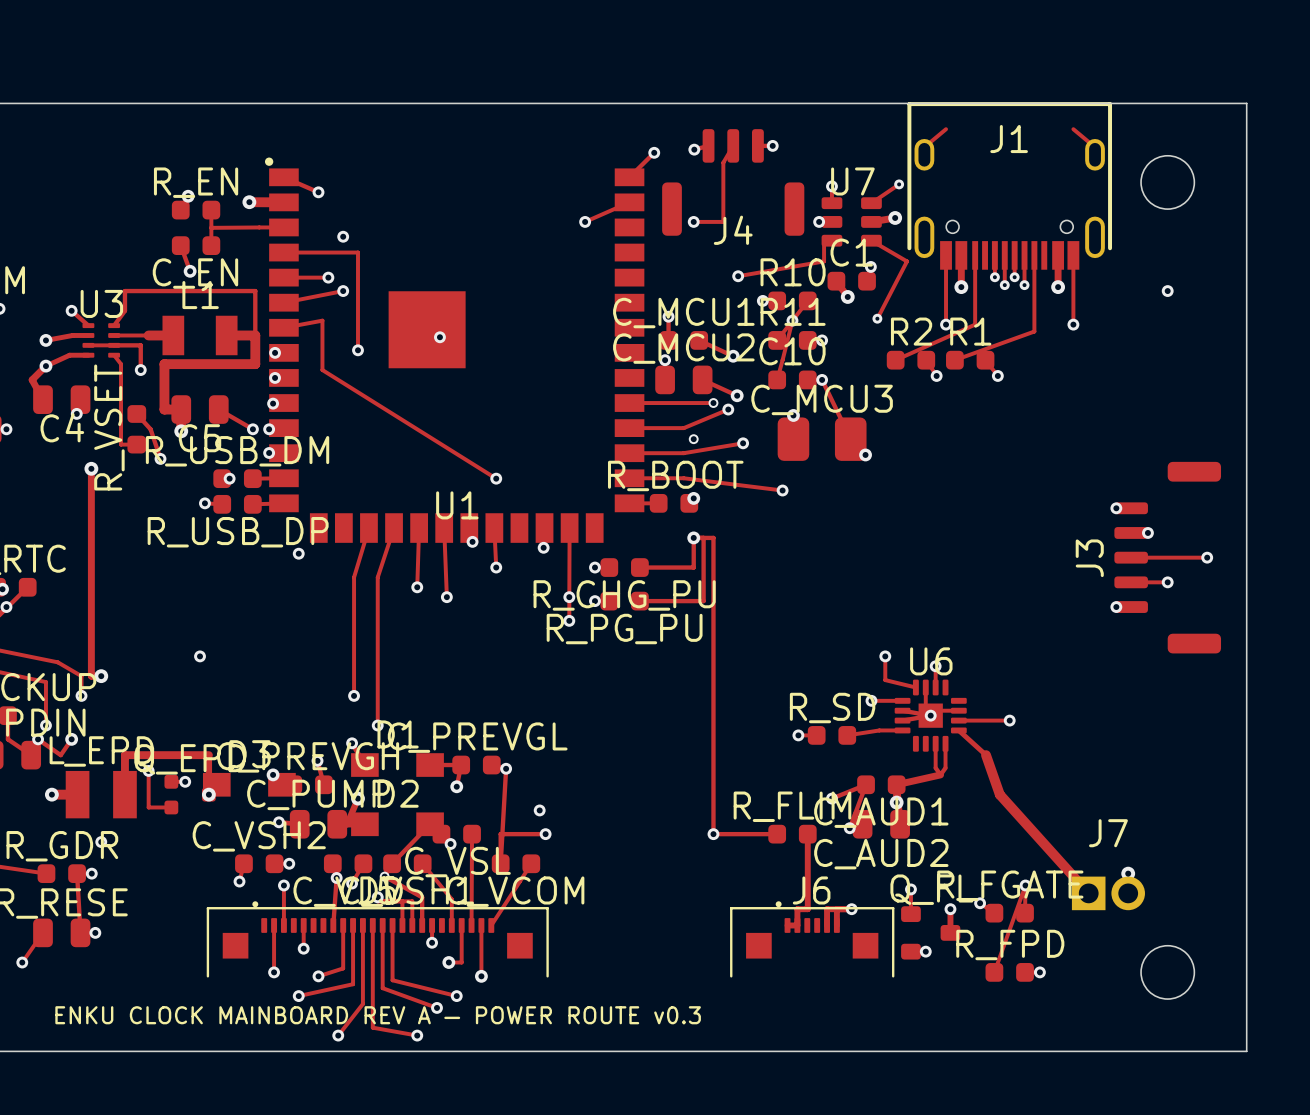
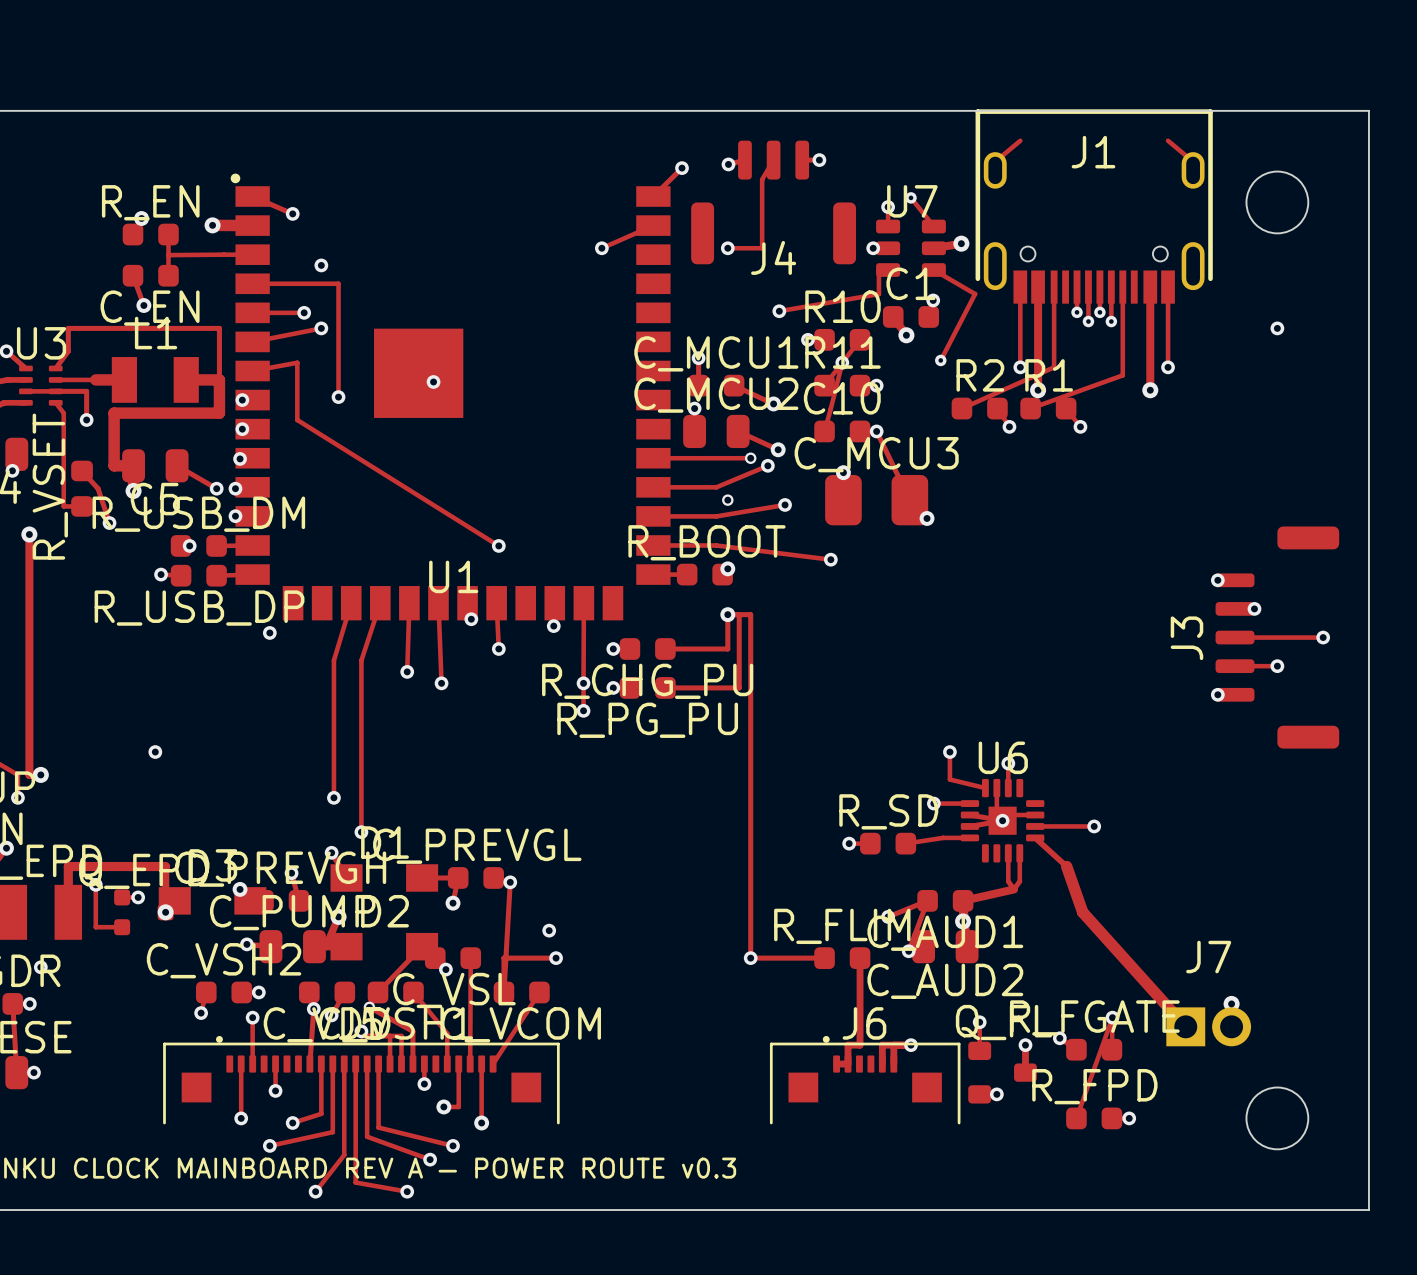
track: (899, 184) (871, 203) -> (910, 197) (933, 226)
via position: (899, 184) -> (910, 197)
track: none -> (1038, 323) (1038, 390)
via: (961, 287) -> none
track: none -> (1150, 323) (1150, 390)
via: (1058, 287) -> none
via: none -> (1038, 390)
via: none -> (1150, 390)

